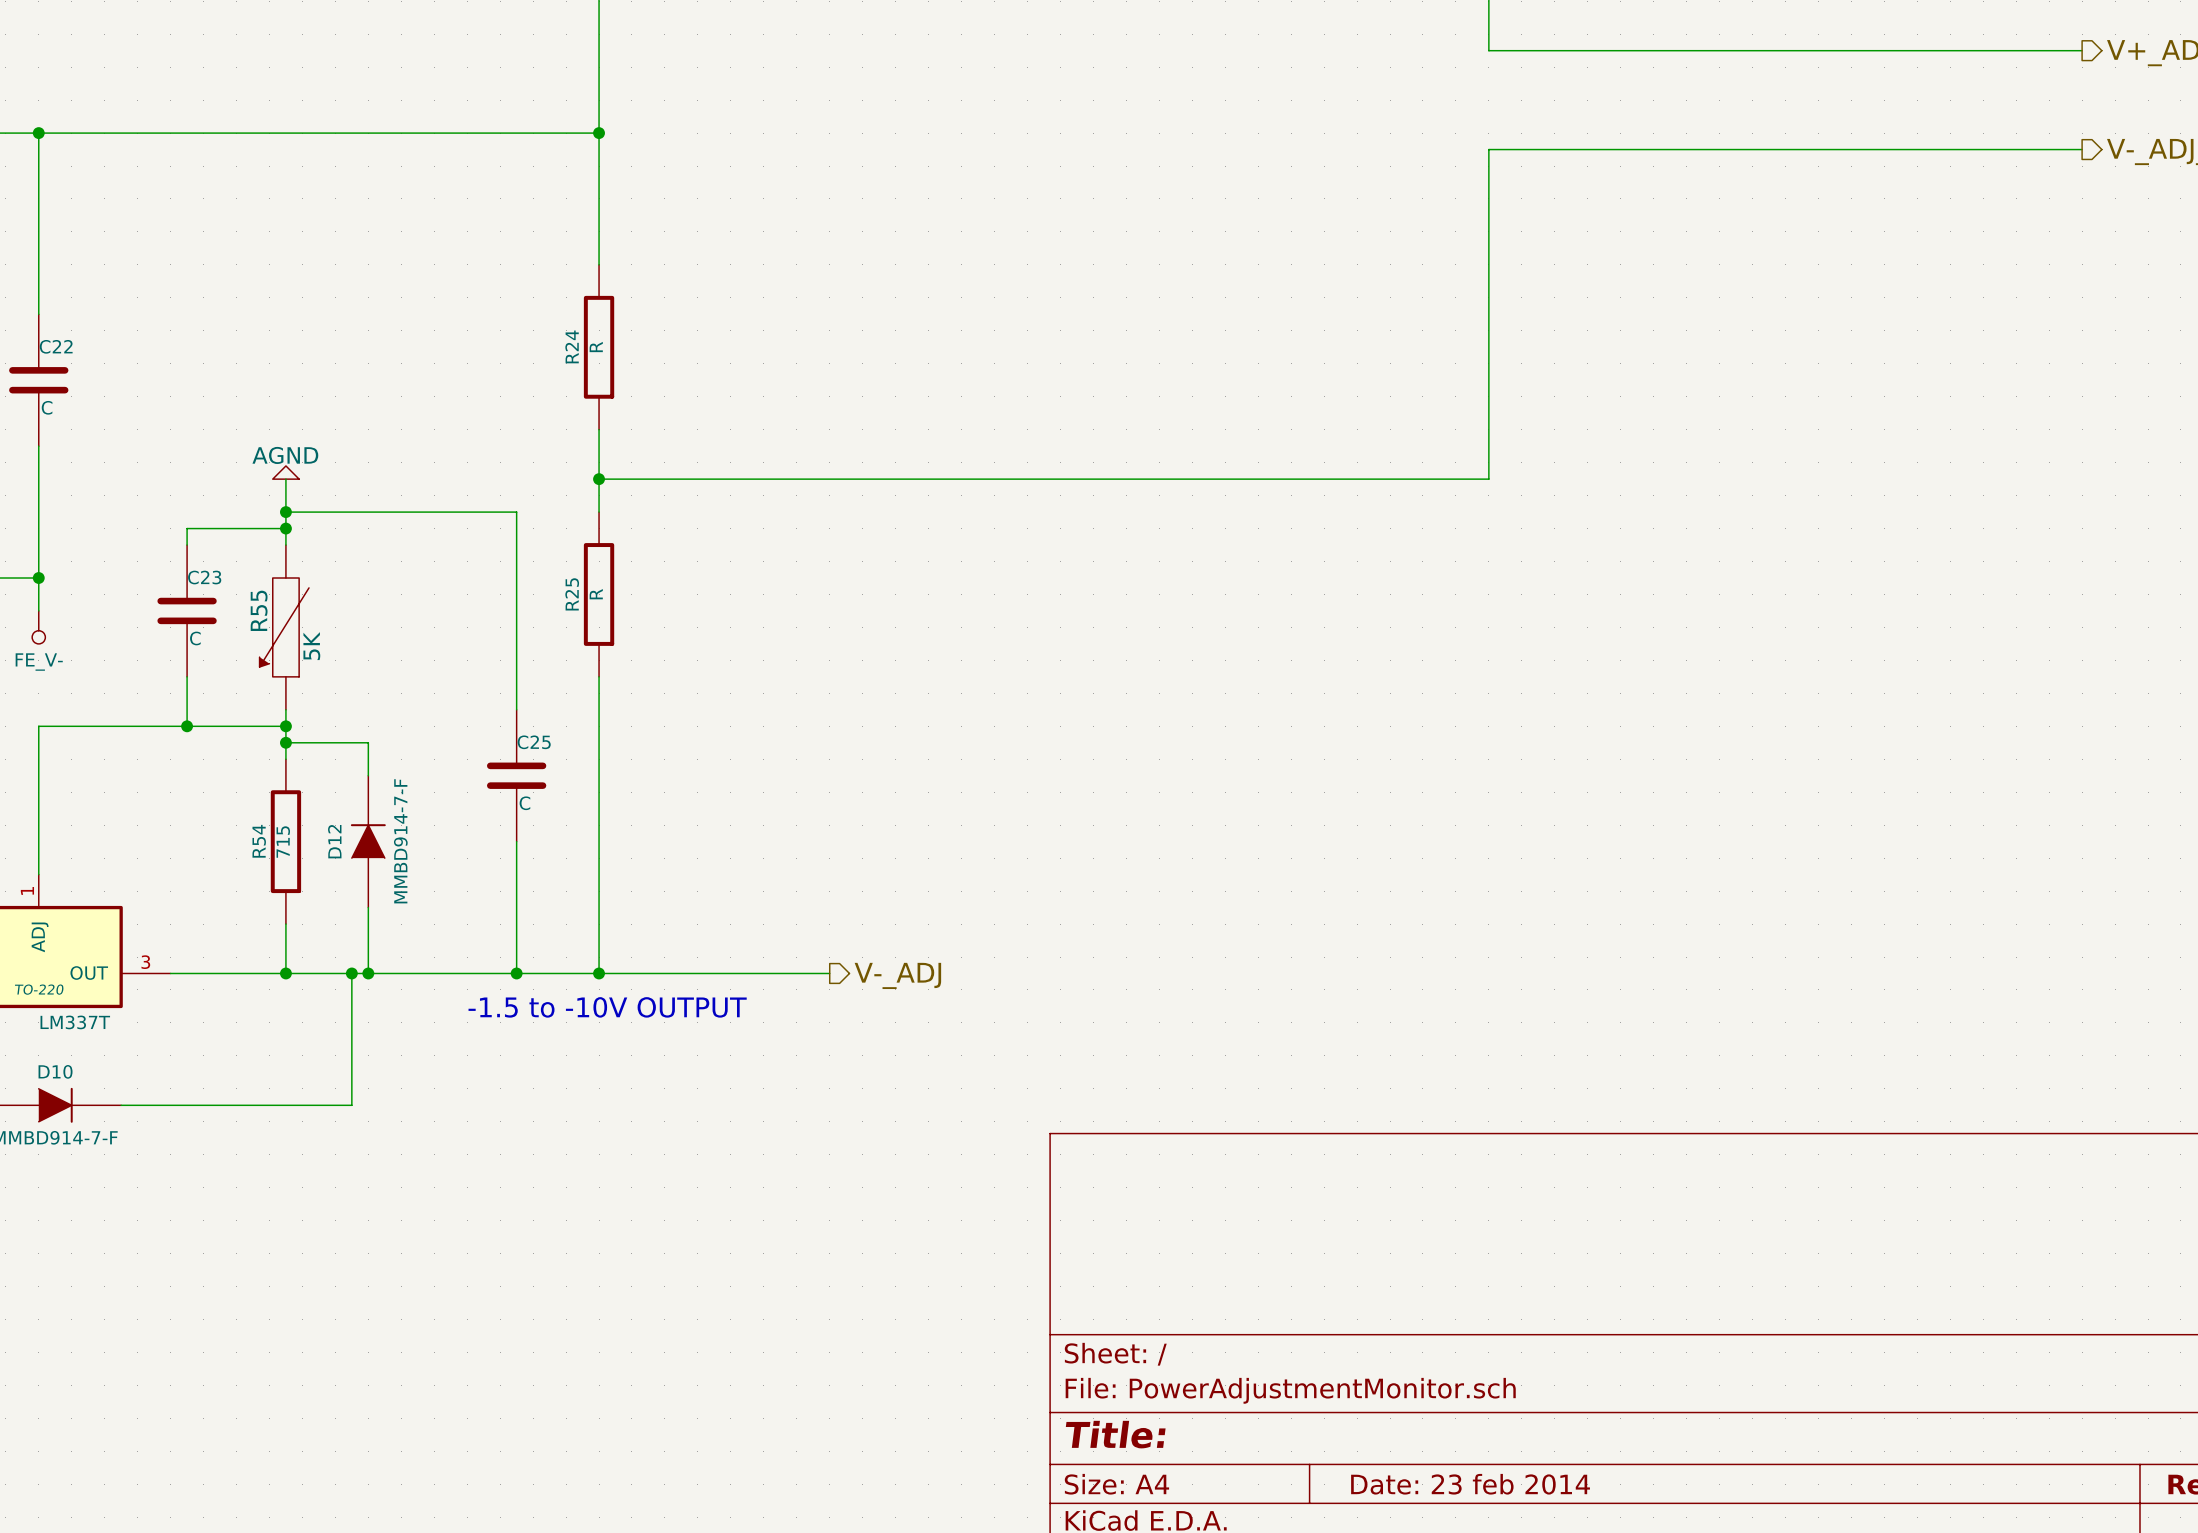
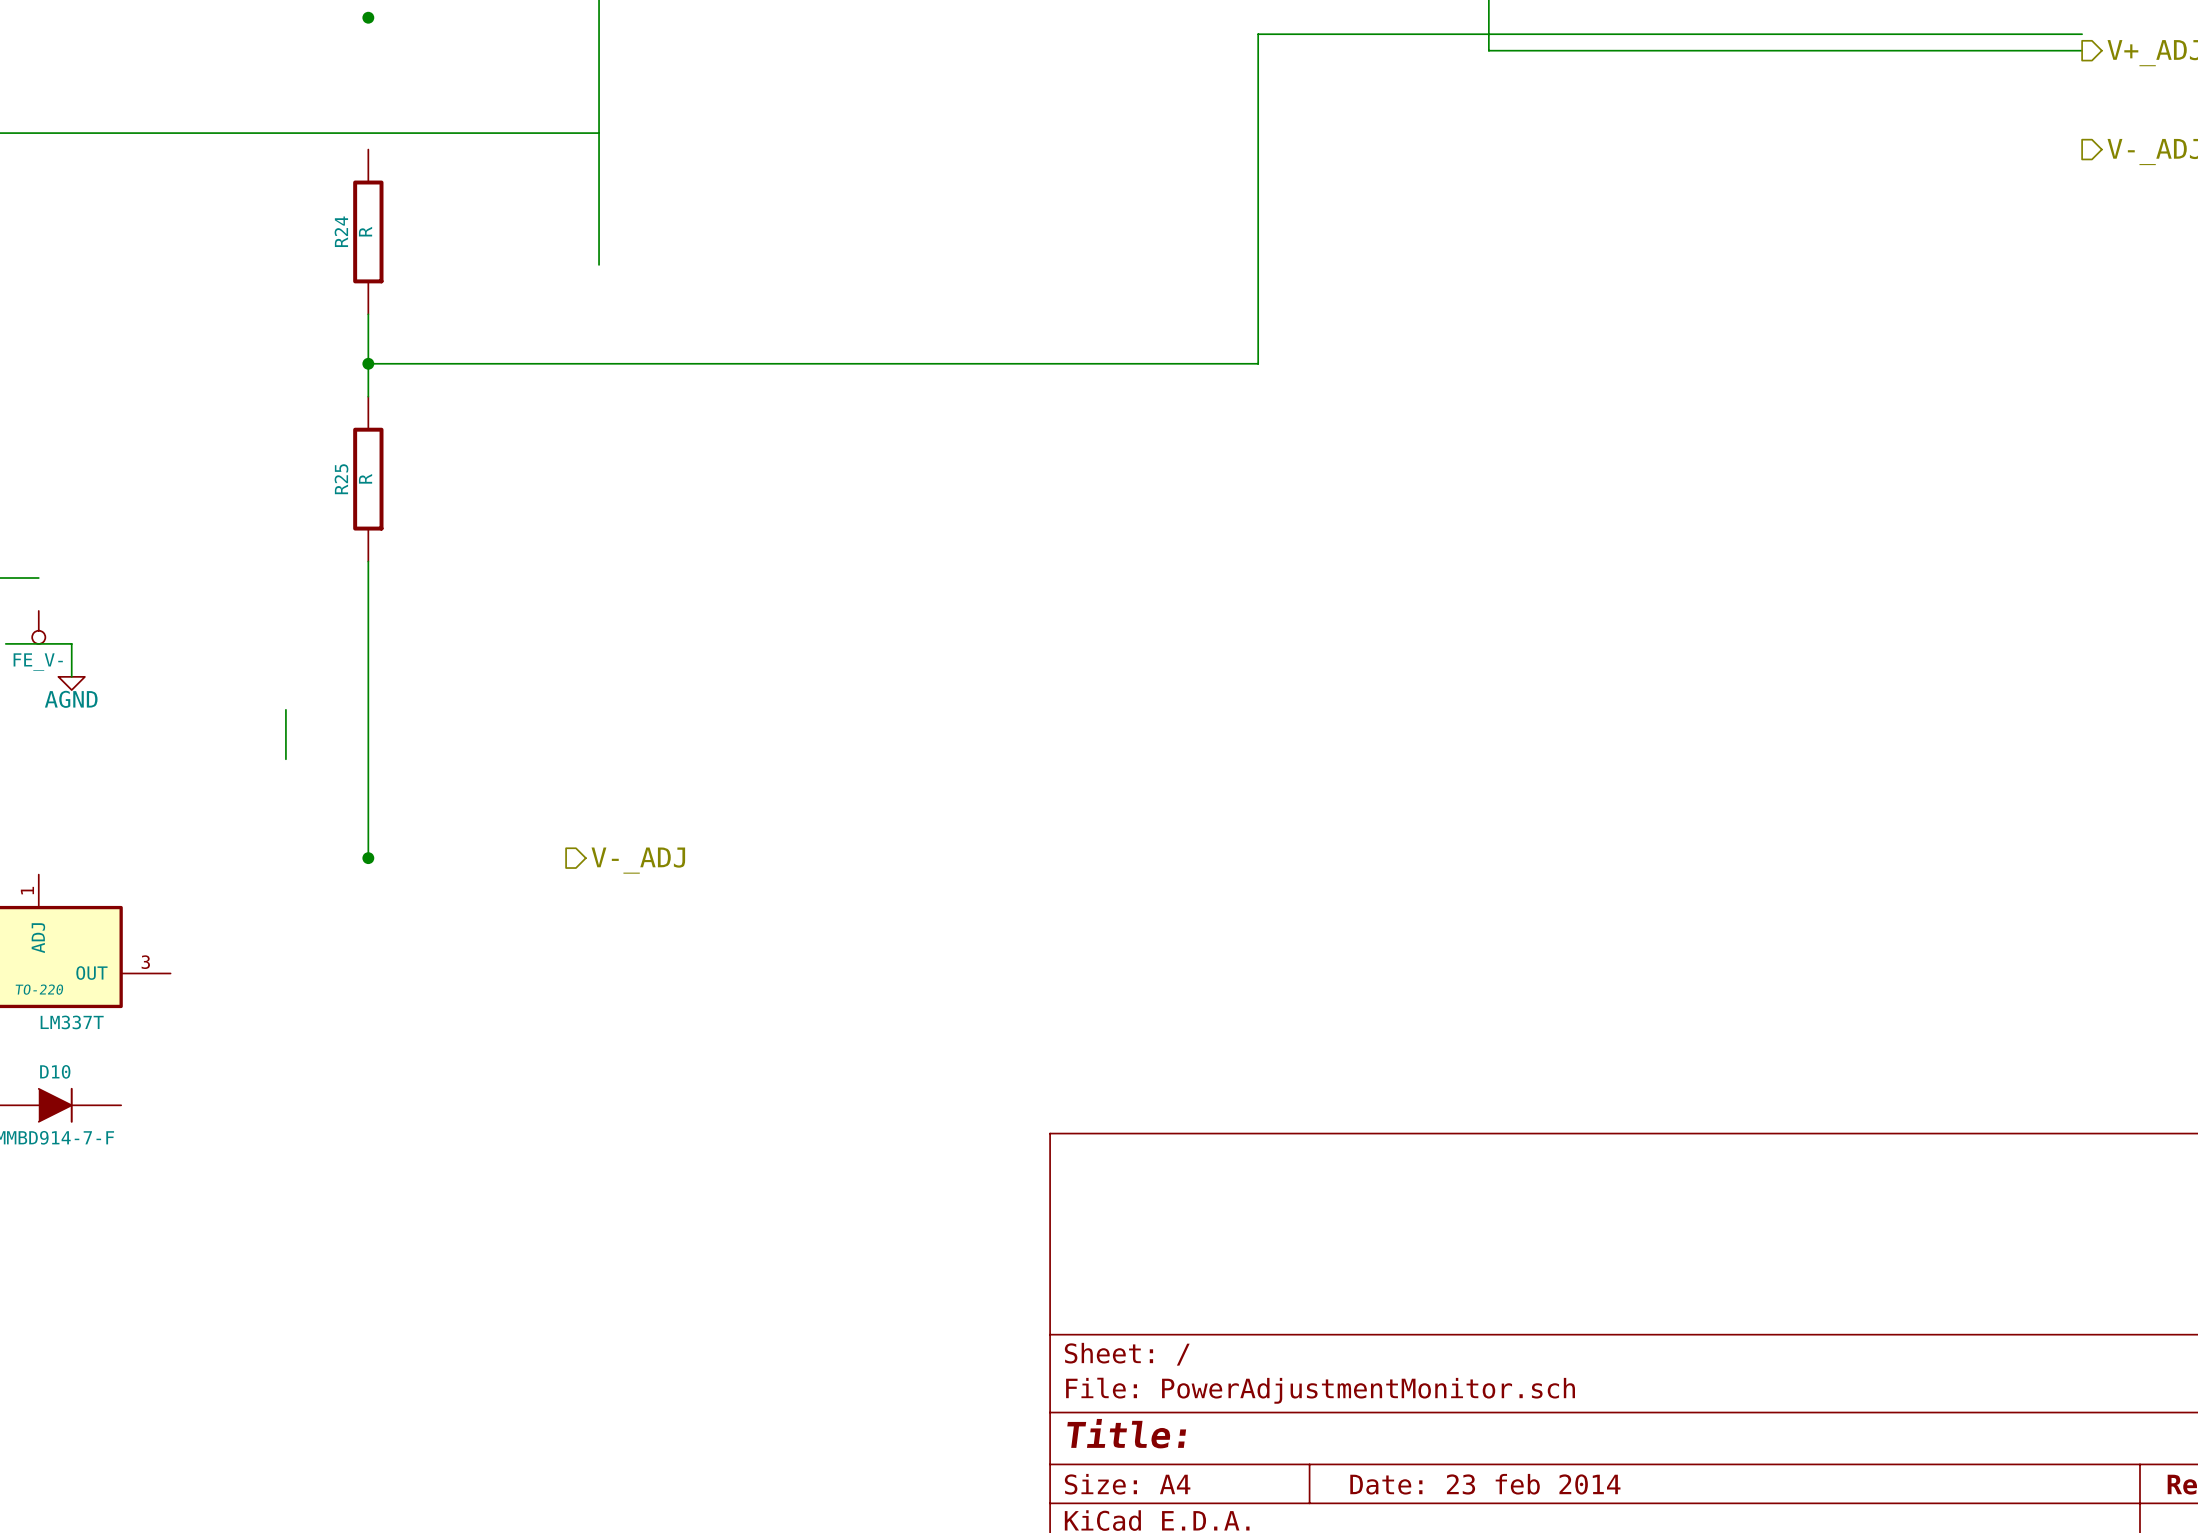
junction: none -> (368, 17)
wire: none -> (2082, 34) (1258, 34) (1258, 363) (368, 363)
wire: (38, 133) (38, 314) -> none
junction: (38, 133) -> none
junction: (599, 133) -> none
wire: (2082, 149) (1488, 149) (1488, 479) (599, 479) -> none
R24 position: (599, 347) -> (368, 231)
junction: none -> (368, 363)
C22: C (38, 380) -> none
wire: (599, 429) (599, 512) -> (368, 314) (368, 396)
wire: (38, 446) (38, 610) -> none
power symbol: AGND (285, 472) -> none
wire: (285, 479) (285, 545) -> none
junction: (599, 479) -> none
wire: (285, 512) (516, 512) (516, 709) -> none
junction: (285, 512) -> none
wire: (285, 528) (187, 528) (187, 545) -> none
junction: (285, 528) -> none
junction: (38, 578) -> none
R25 position: (599, 594) -> (368, 479)
C23: C (187, 610) -> none
R55: 5K (284, 627) -> none
wire: none -> (5, 643) (71, 643) (71, 676)
wire: (187, 676) (187, 726) -> none
wire: (599, 676) (599, 973) -> none
power symbol: none -> AGND (71, 683)
junction: (187, 726) -> none
wire: (285, 726) (38, 726) (38, 874) -> none
junction: (285, 726) -> none
wire: (285, 742) (368, 742) -> (368, 561) (368, 742)
junction: (285, 742) -> none
C25: C (516, 775) -> none
R54: 715 (285, 841) -> none
D12: MMBD914-7-F (368, 841) -> none
wire: (516, 841) (516, 973) -> none
junction: none -> (368, 858)
wire: (368, 907) (368, 973) -> none
wire: (285, 924) (285, 973) -> none
wire: (170, 973) (829, 973) -> none
junction: (285, 973) -> none
wire: (351, 973) (351, 1105) (121, 1105) -> none
junction: (351, 973) -> none
junction: (368, 973) -> none
junction: (516, 973) -> none
junction: (599, 973) -> none
hierarchical label position: V-_ADJ (897, 975) -> V-_ADJ (638, 860)
text: -1.5 to -10V OUTPUT (607, 1007) -> none

